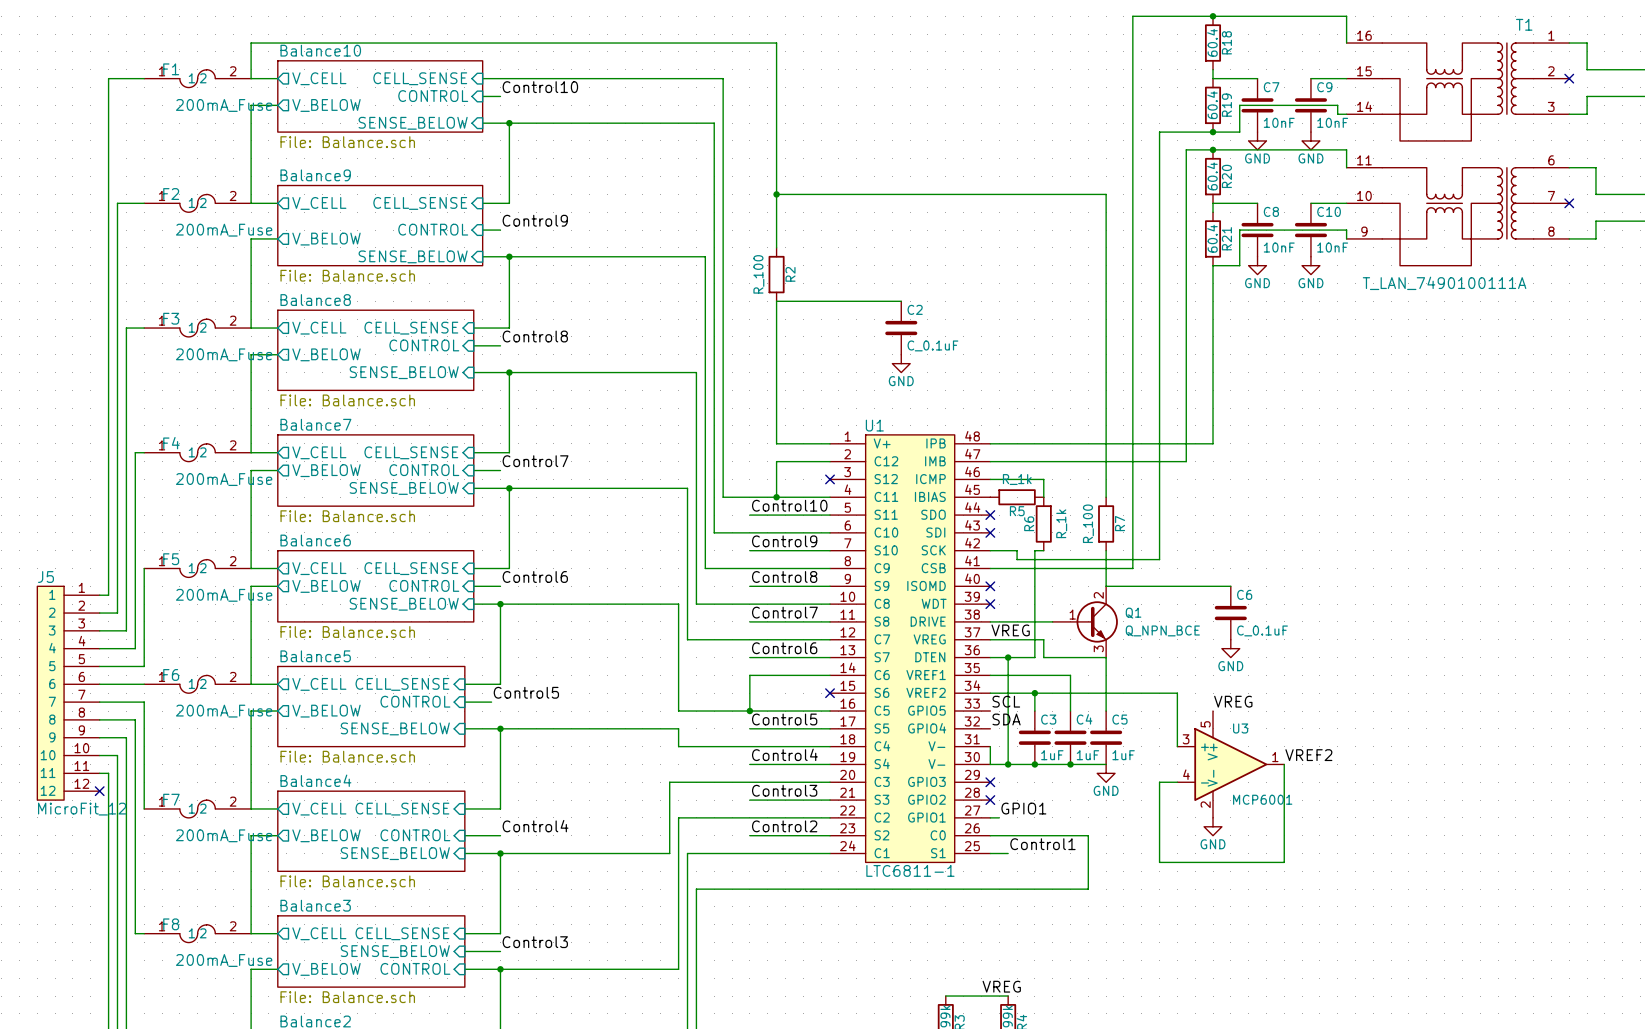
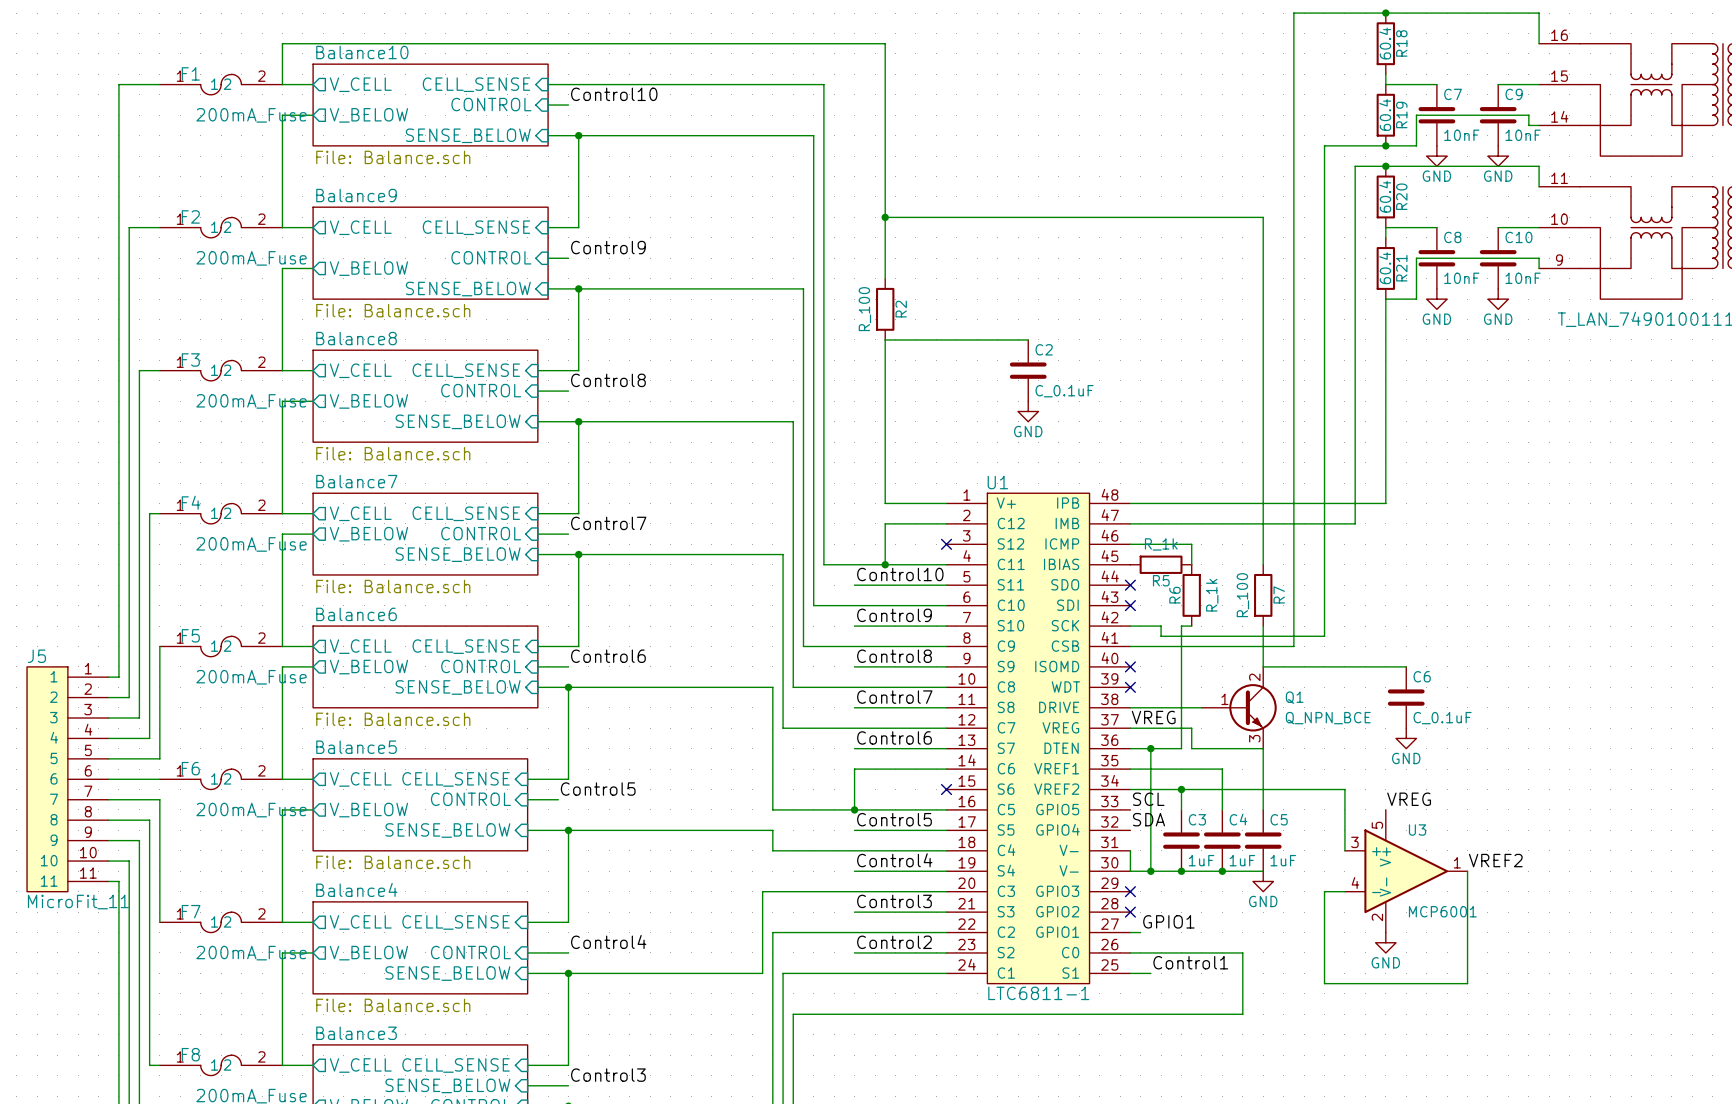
J5 symbol: [37, 586, 100, 801] -> [27, 666, 109, 892]
no-connect mark: (99, 791) -> none
J5 value: MicroFit_12 (82, 809) -> MicroFit_11 (78, 902)

